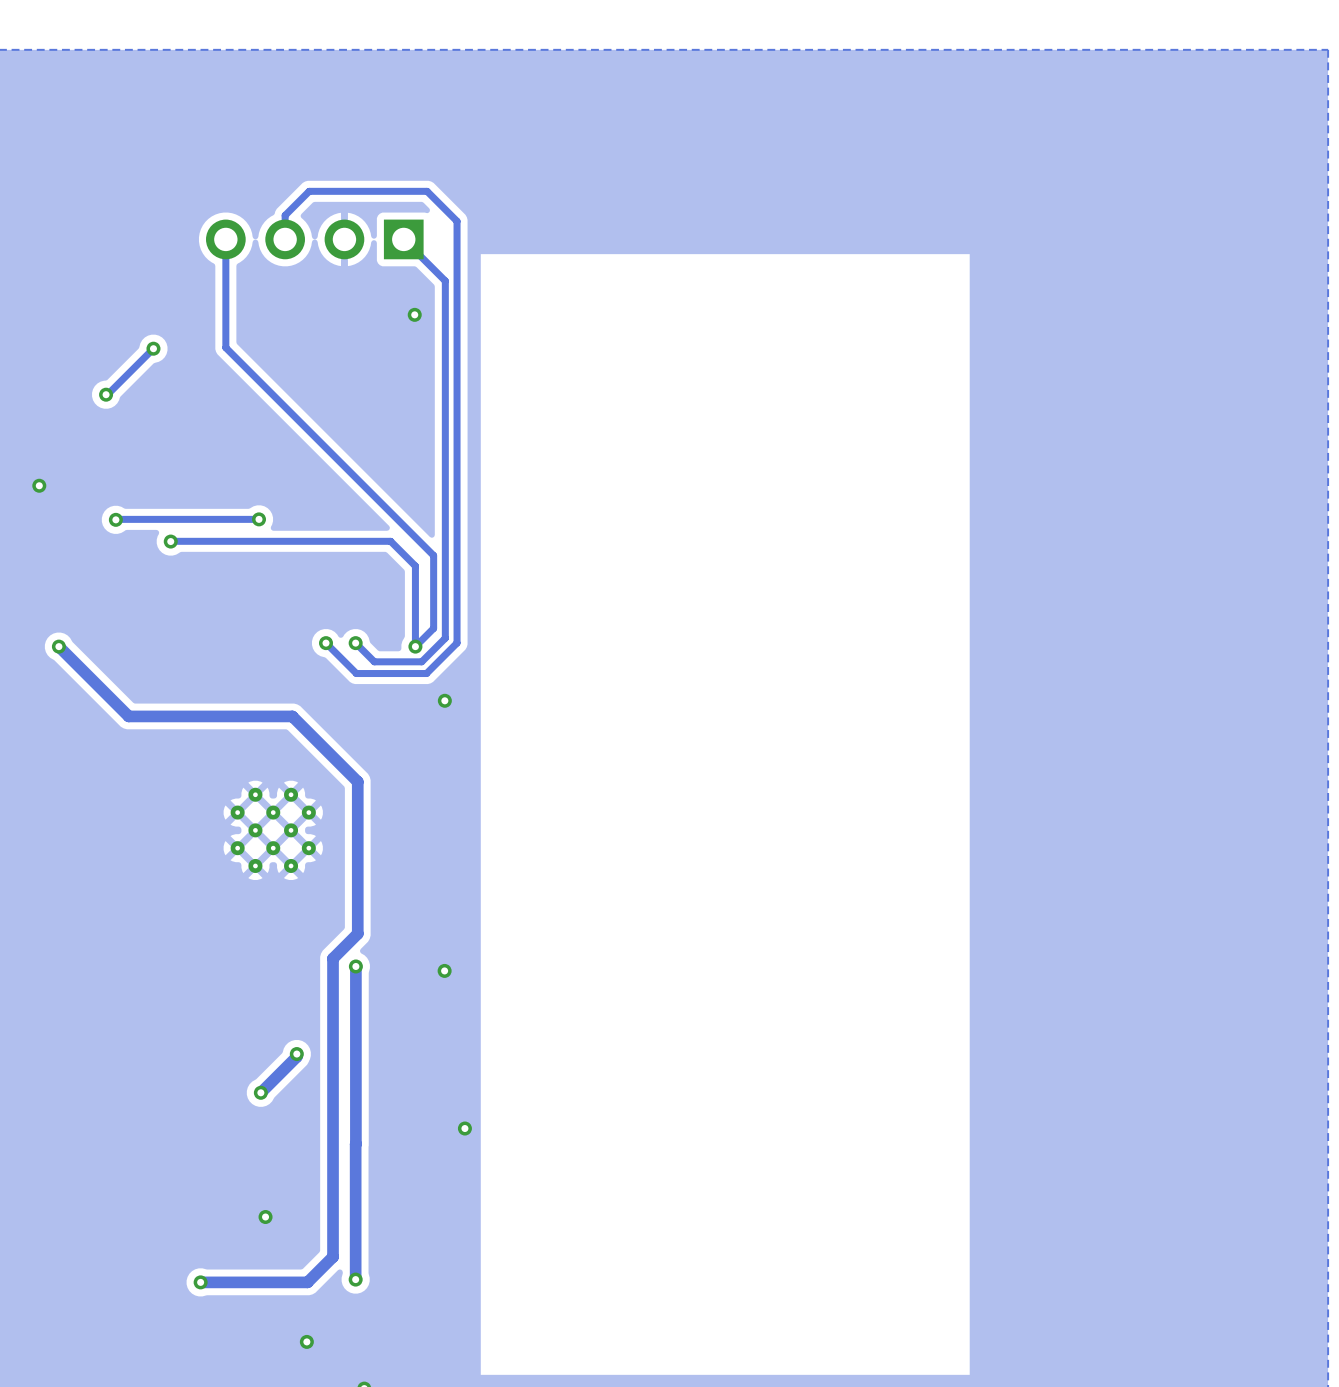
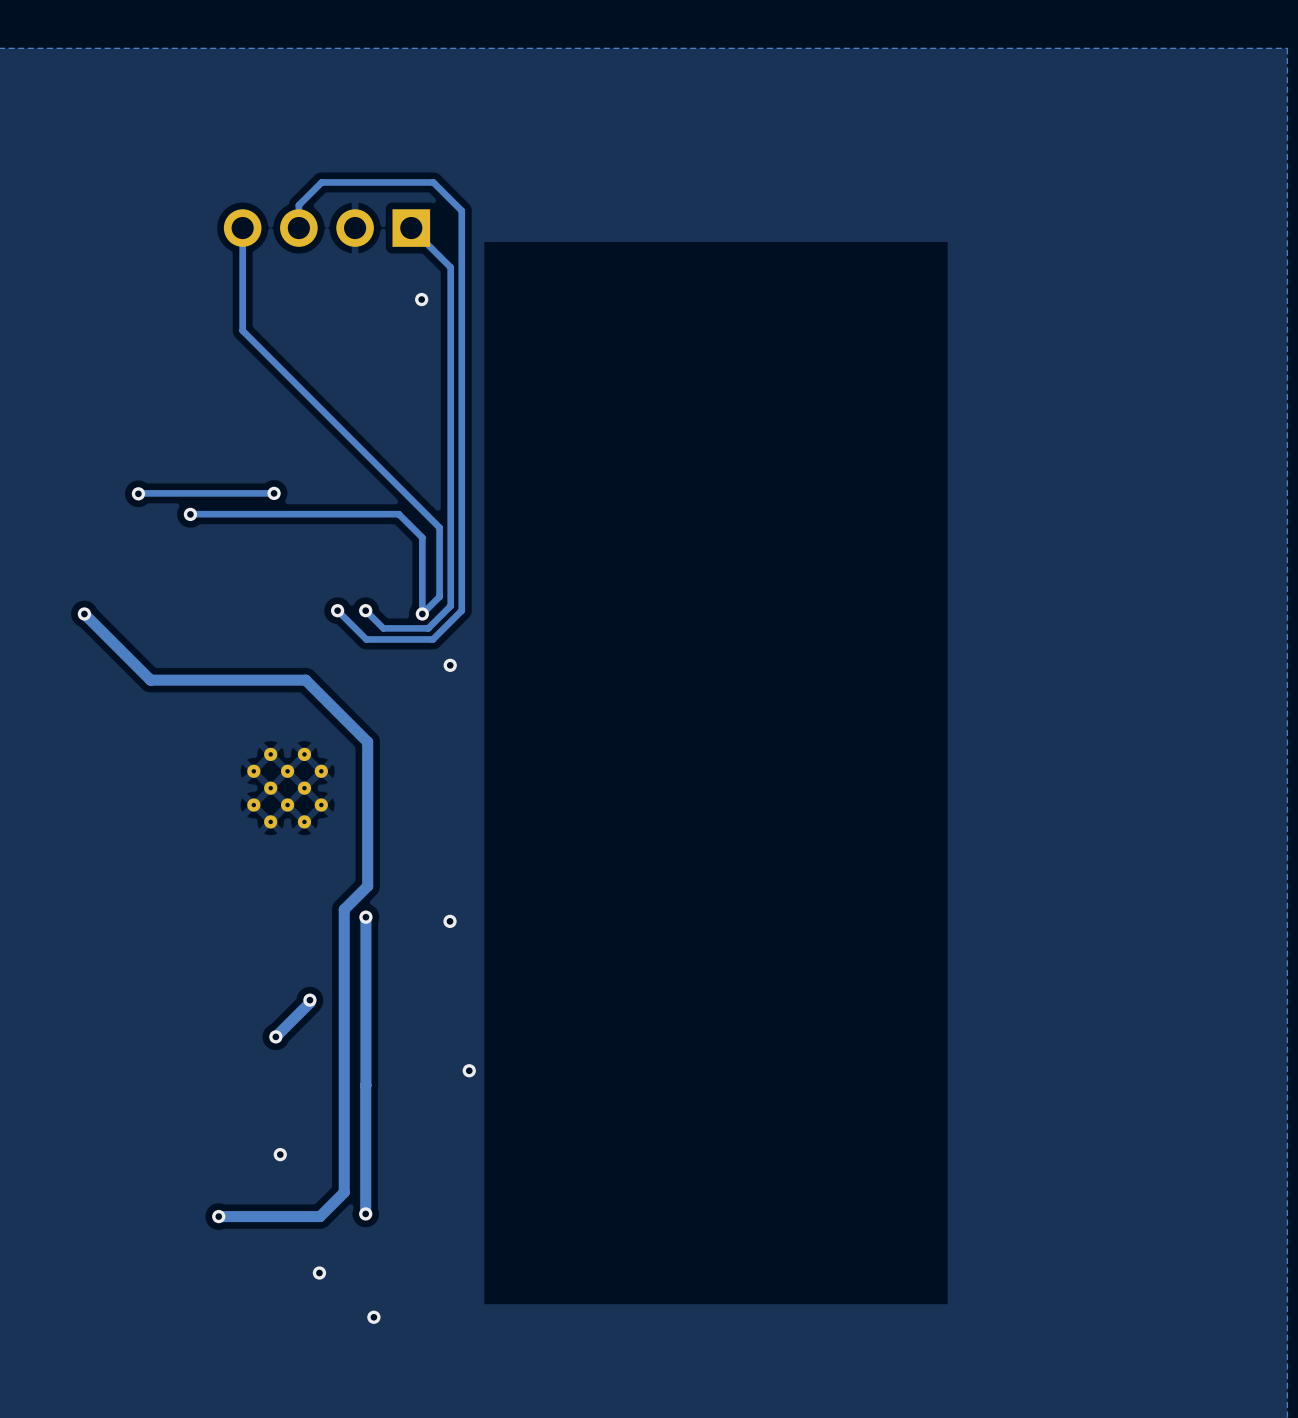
track: (153, 348) (106, 394) -> none
via: (153, 348) -> none
via: (106, 394) -> none
via: (39, 485) -> none

